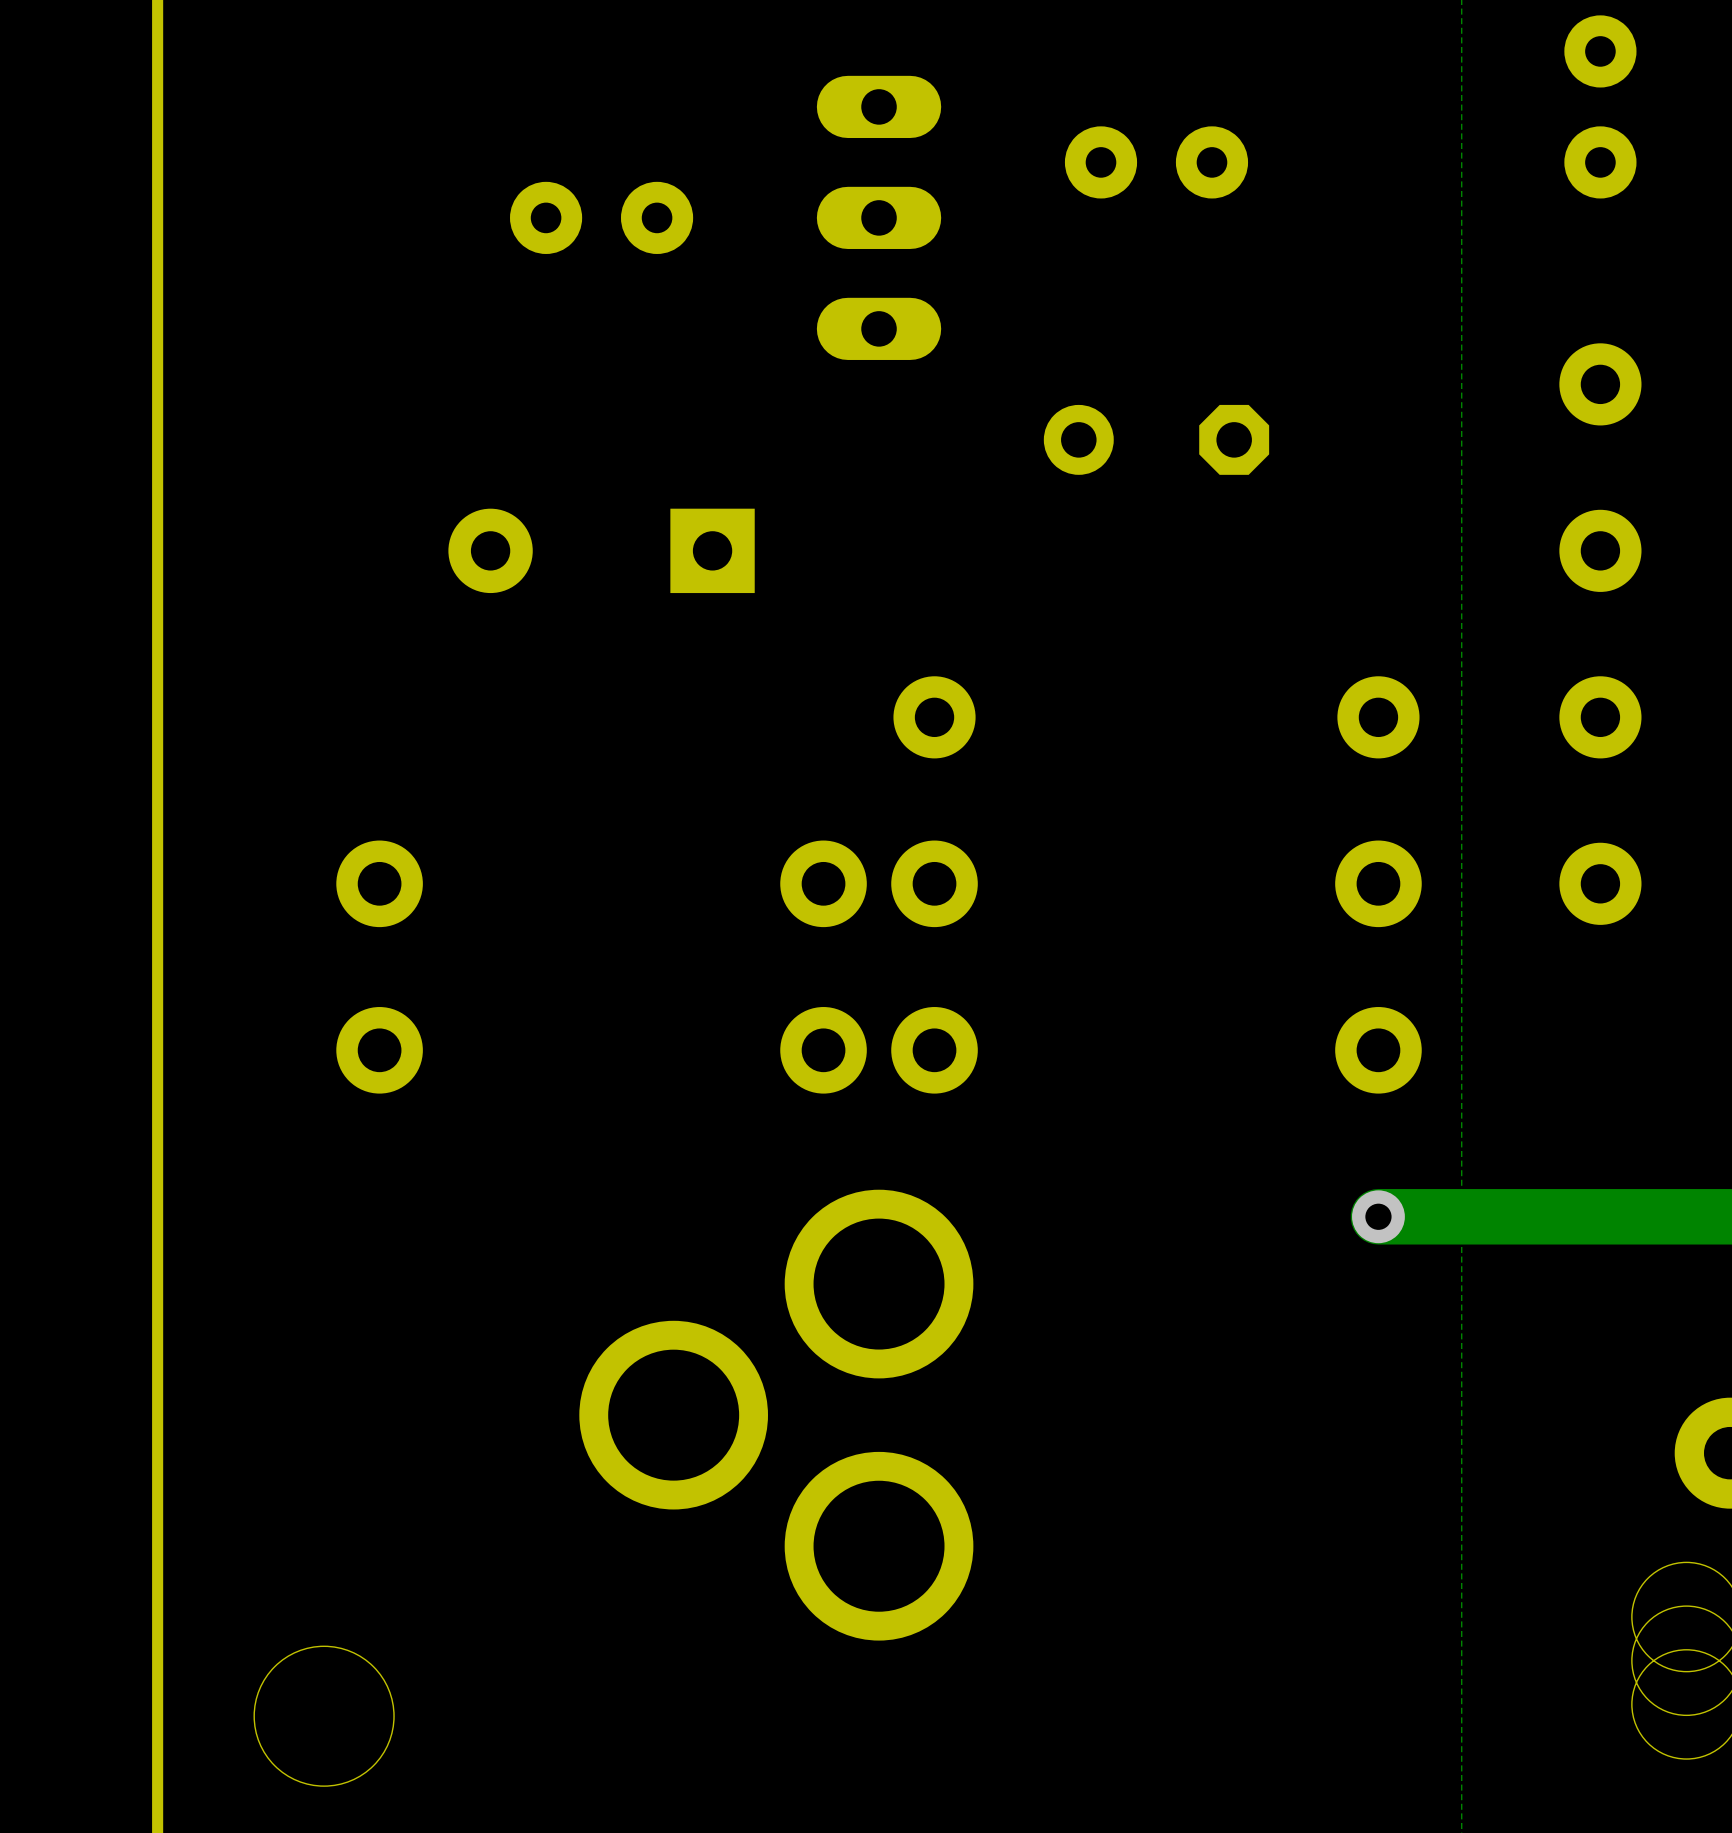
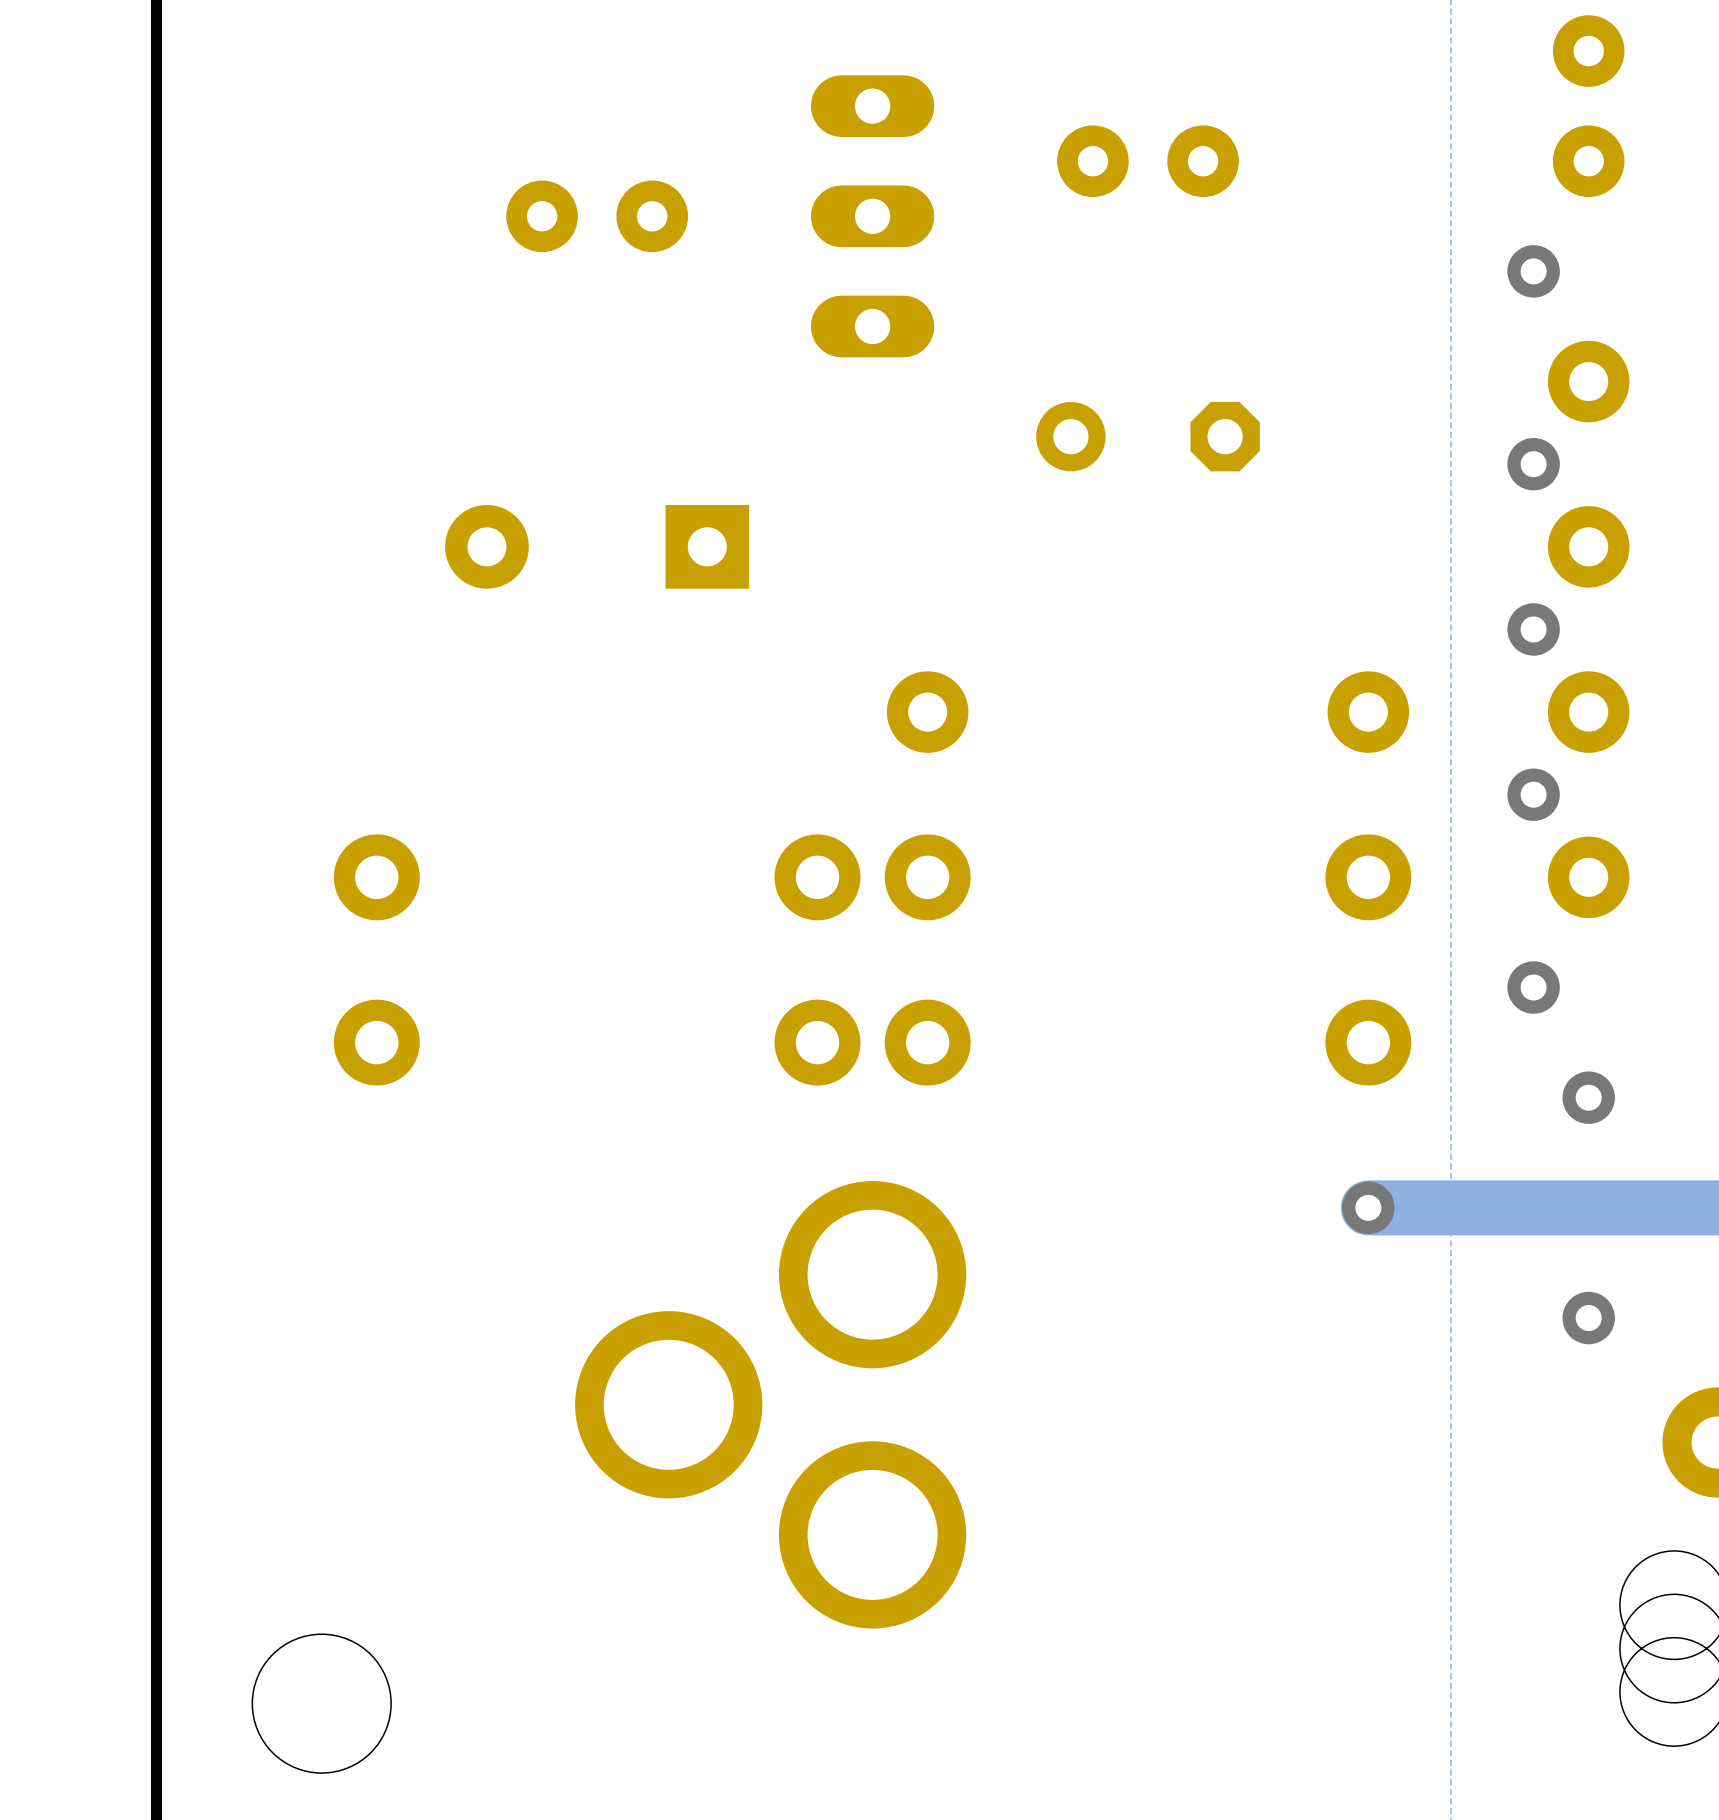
via: none -> (1533, 271)
via: none -> (1533, 464)
via: none -> (1533, 629)
via: none -> (1533, 794)
via: none -> (1533, 987)
via: none -> (1588, 1097)
via: none -> (1588, 1318)

